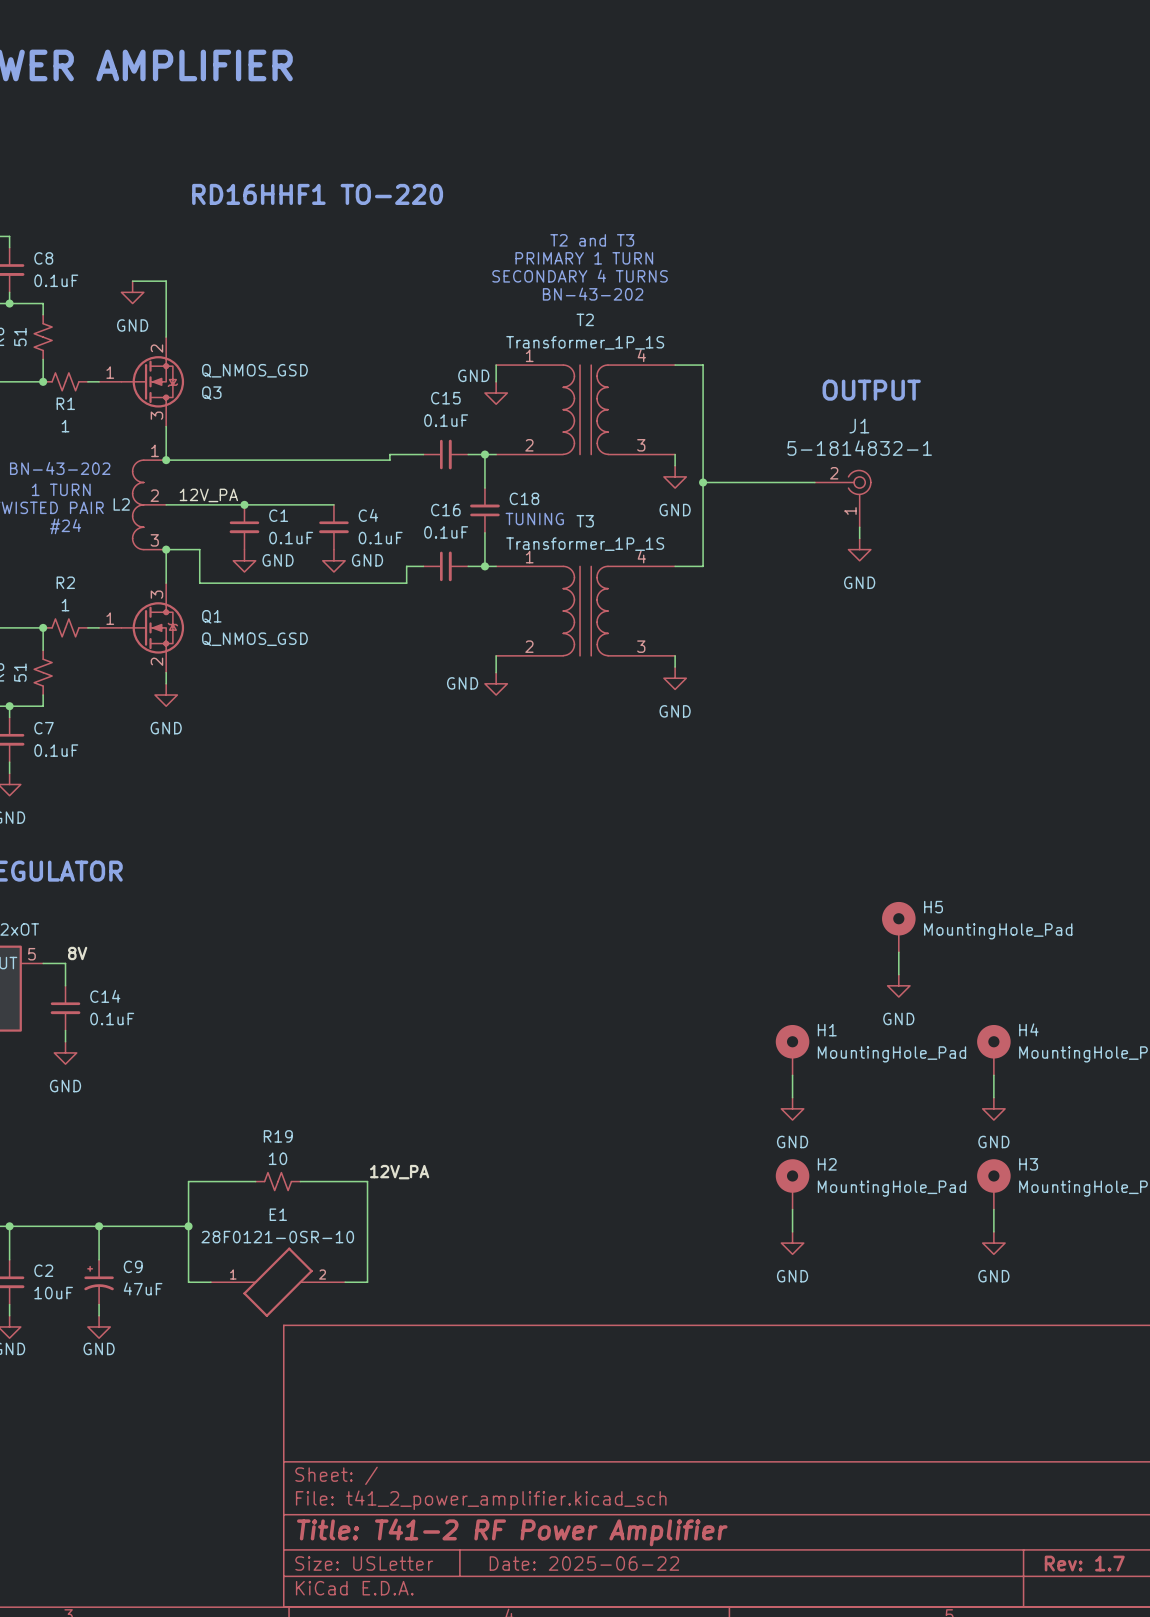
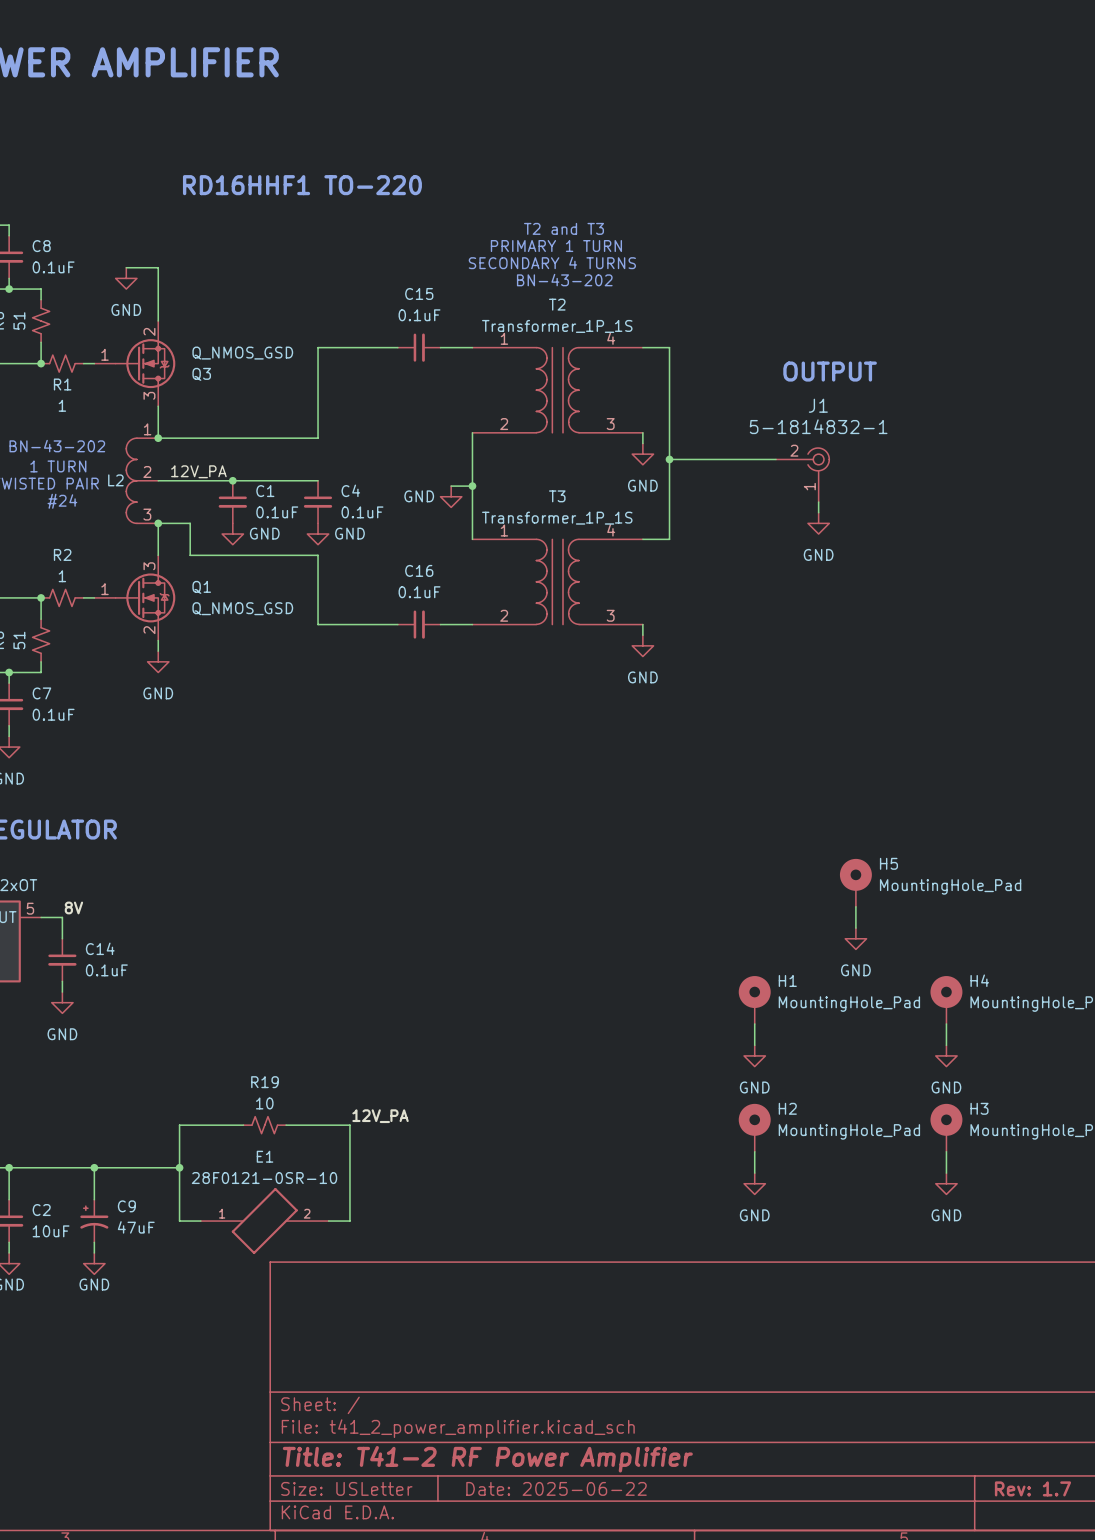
wire: (496, 365) (496, 381) -> (472, 347) (440, 347)
power symbol: GND (496, 393) -> none
wire: (423, 454) (389, 454) (389, 460) (333, 460) -> (397, 347) (318, 347) (318, 438)
C15 position: (445, 454) -> (419, 347)
wire: (468, 454) (496, 454) -> (472, 539) (472, 432)
wire: (484, 454) (484, 488) -> none
junction: (484, 454) -> none
wire: none -> (451, 486) (472, 486)
C18: (484, 510) -> none
junction: none -> (472, 486)
text: TUNING (534, 519) -> none
power symbol: none -> GND (451, 496)
wire: (484, 532) (484, 566) -> none
wire: (423, 566) (406, 566) (406, 583) (333, 583) -> (397, 624) (318, 624) (318, 555)
C16 position: (445, 566) -> (419, 624)
wire: (468, 566) (496, 566) -> none
junction: (484, 566) -> none
wire: (496, 655) (496, 672) -> (472, 624) (440, 624)
power symbol: GND (496, 683) -> none

